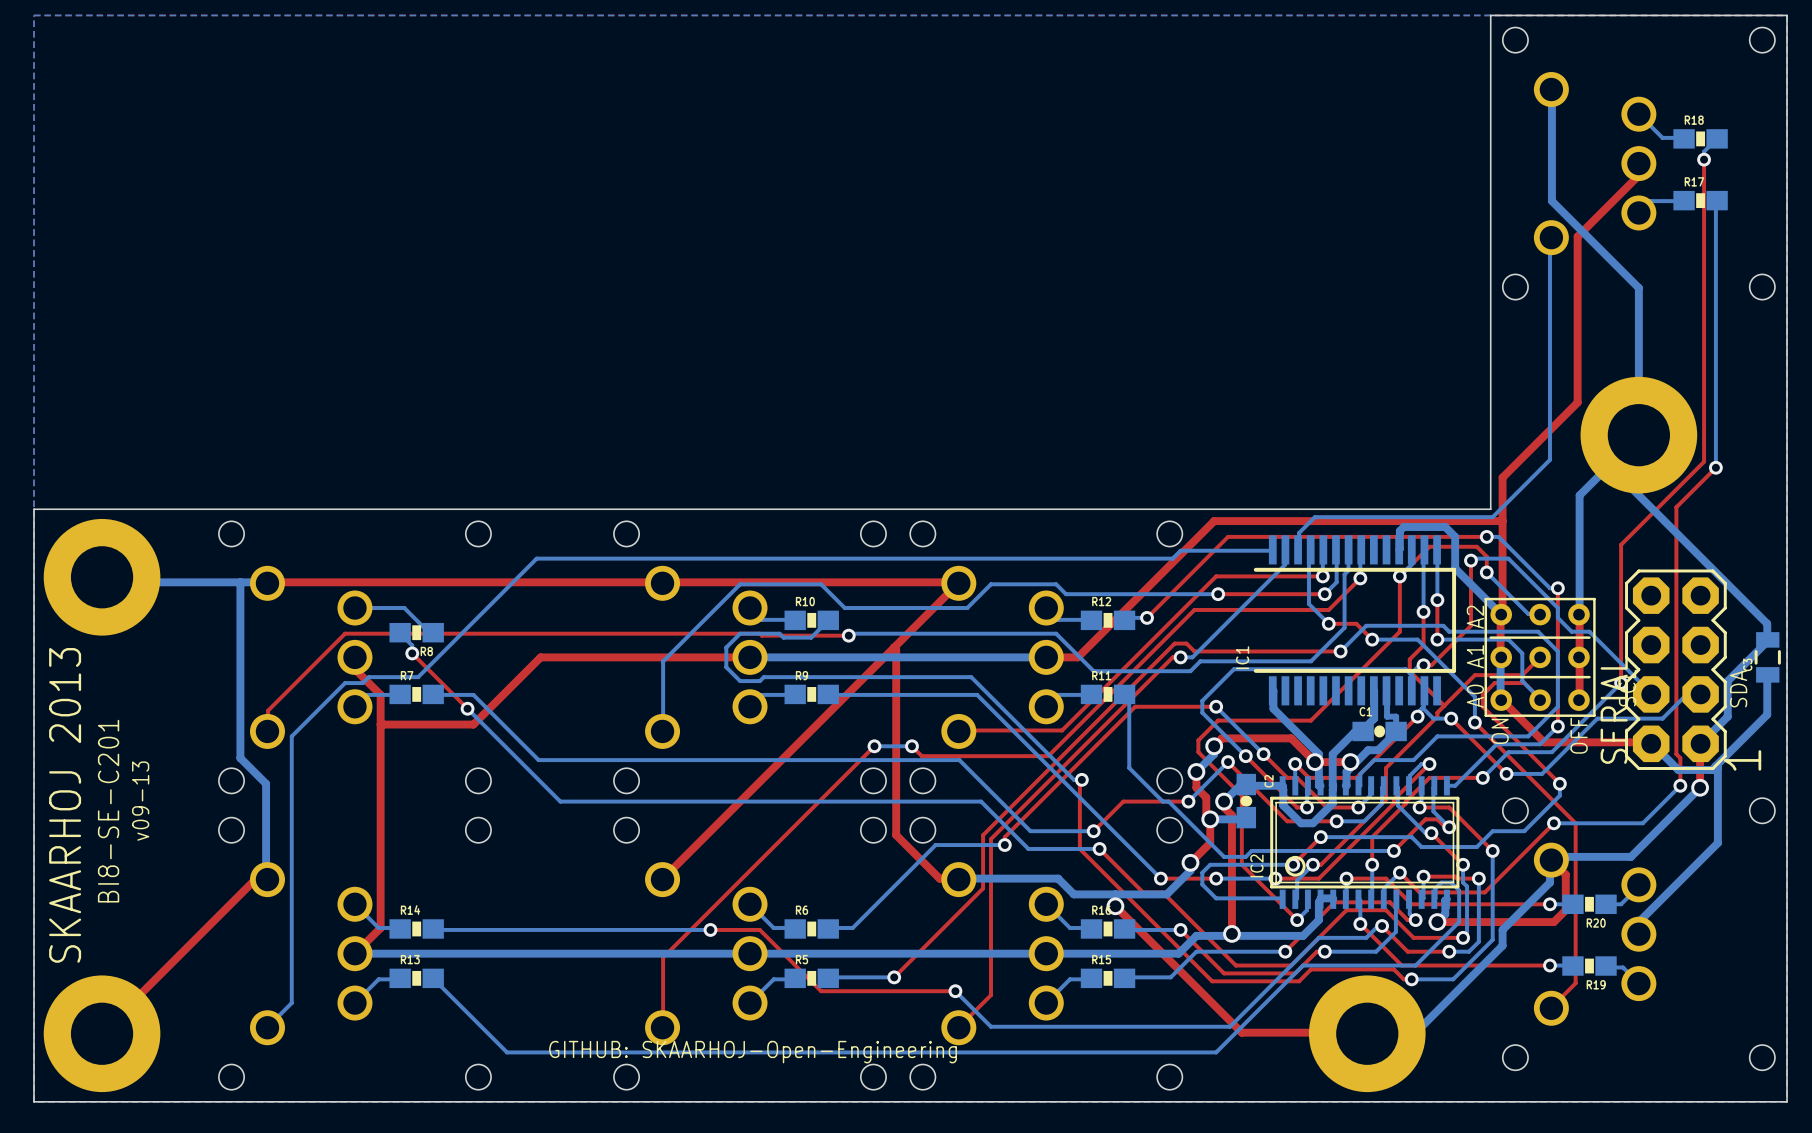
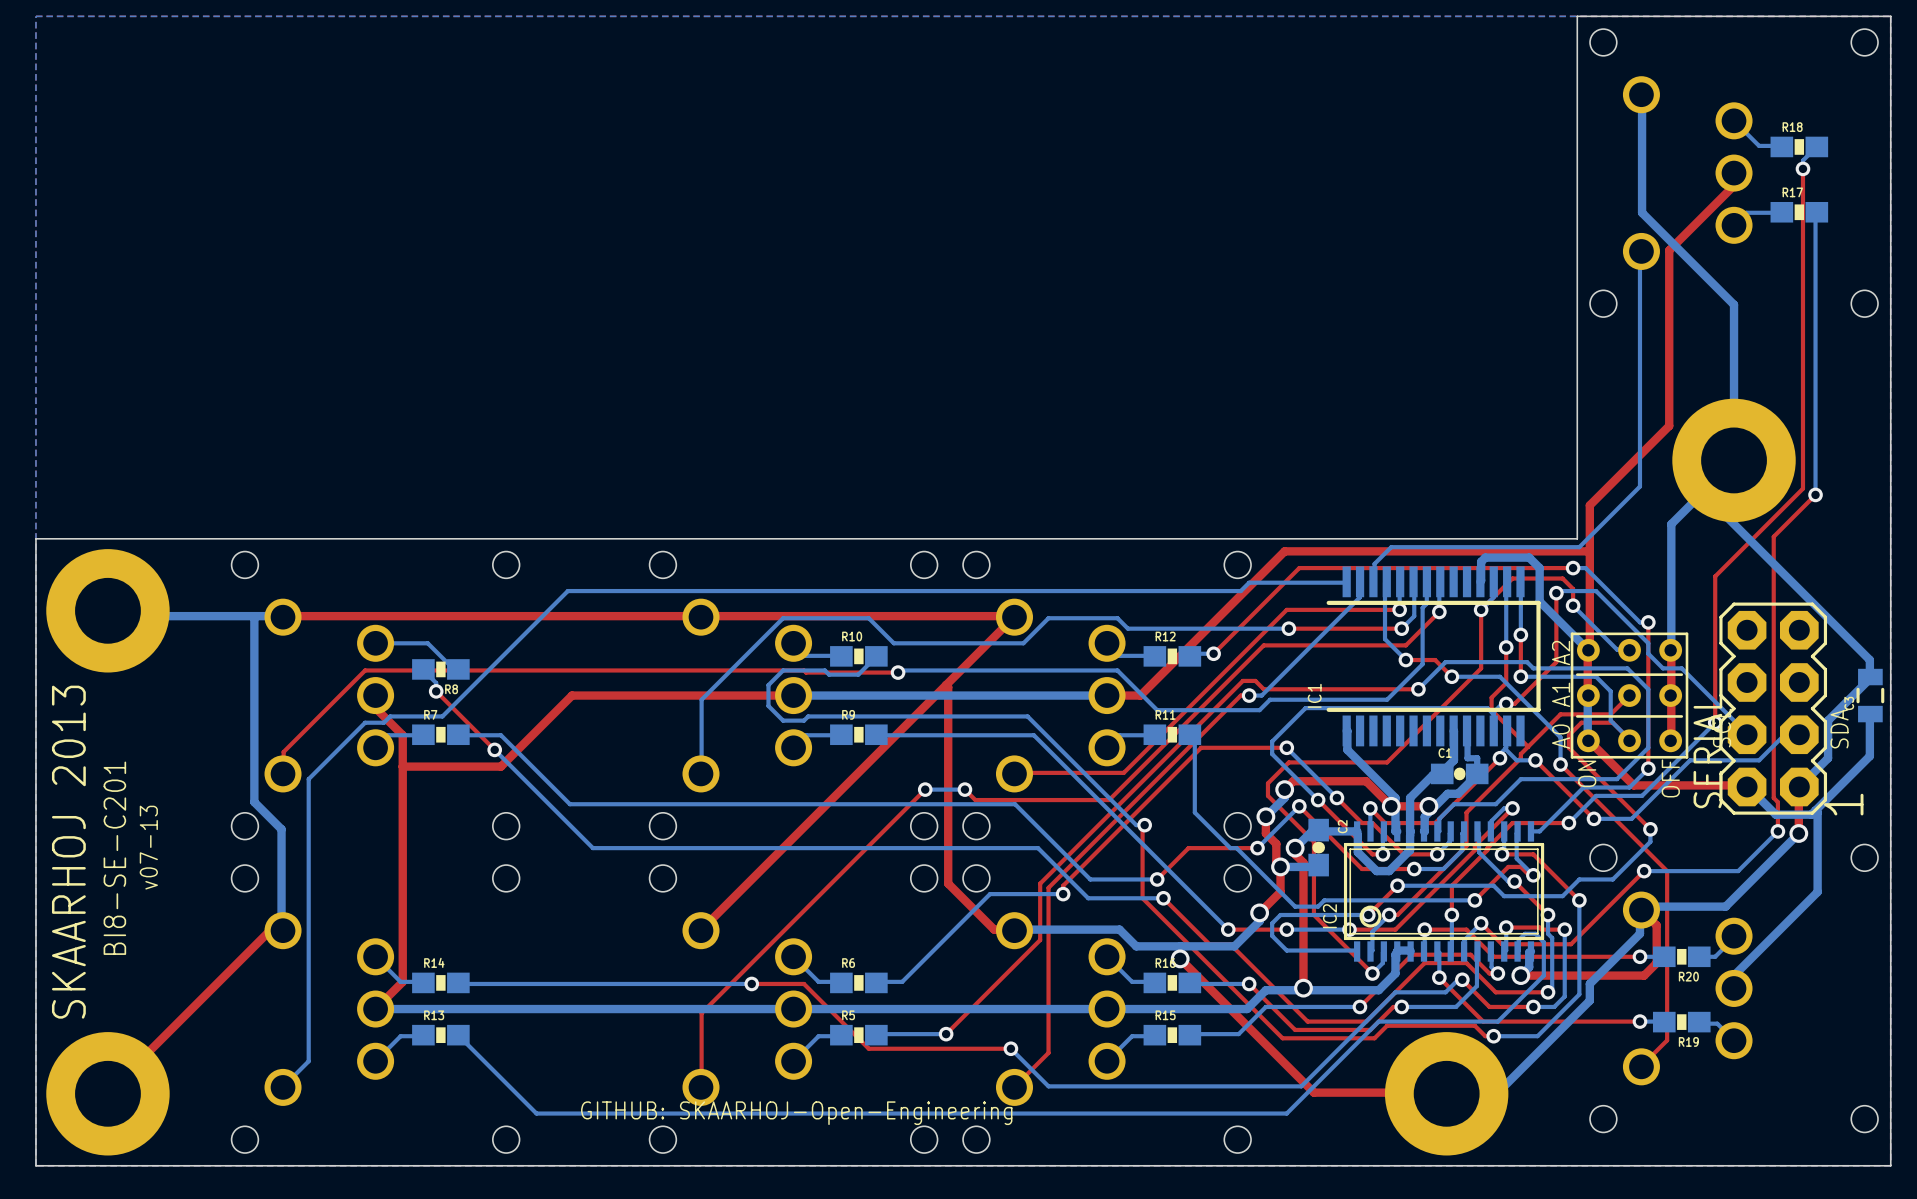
text: v09-13 (140, 801) -> v07-13 (148, 847)

